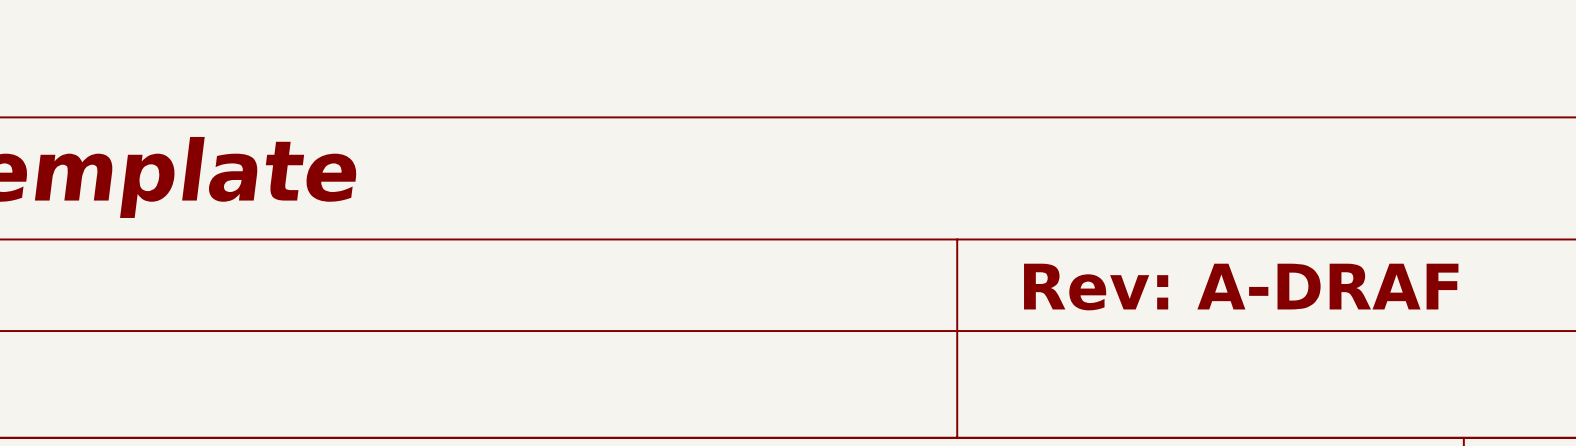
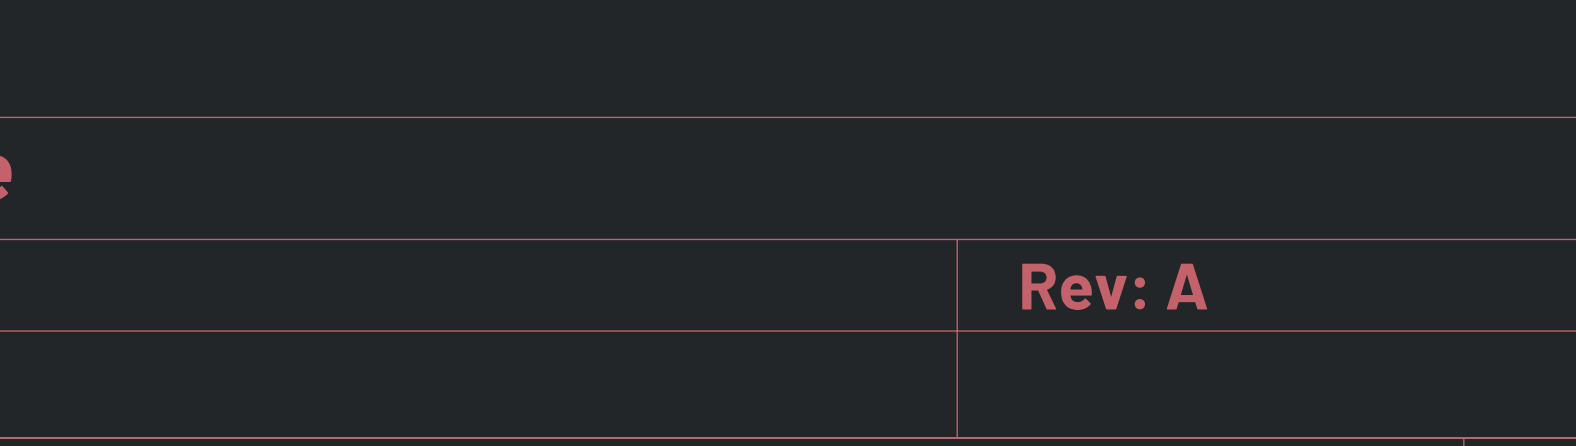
title block: Rev: A-DRAF (1241, 287) -> Rev: A (1114, 286)

